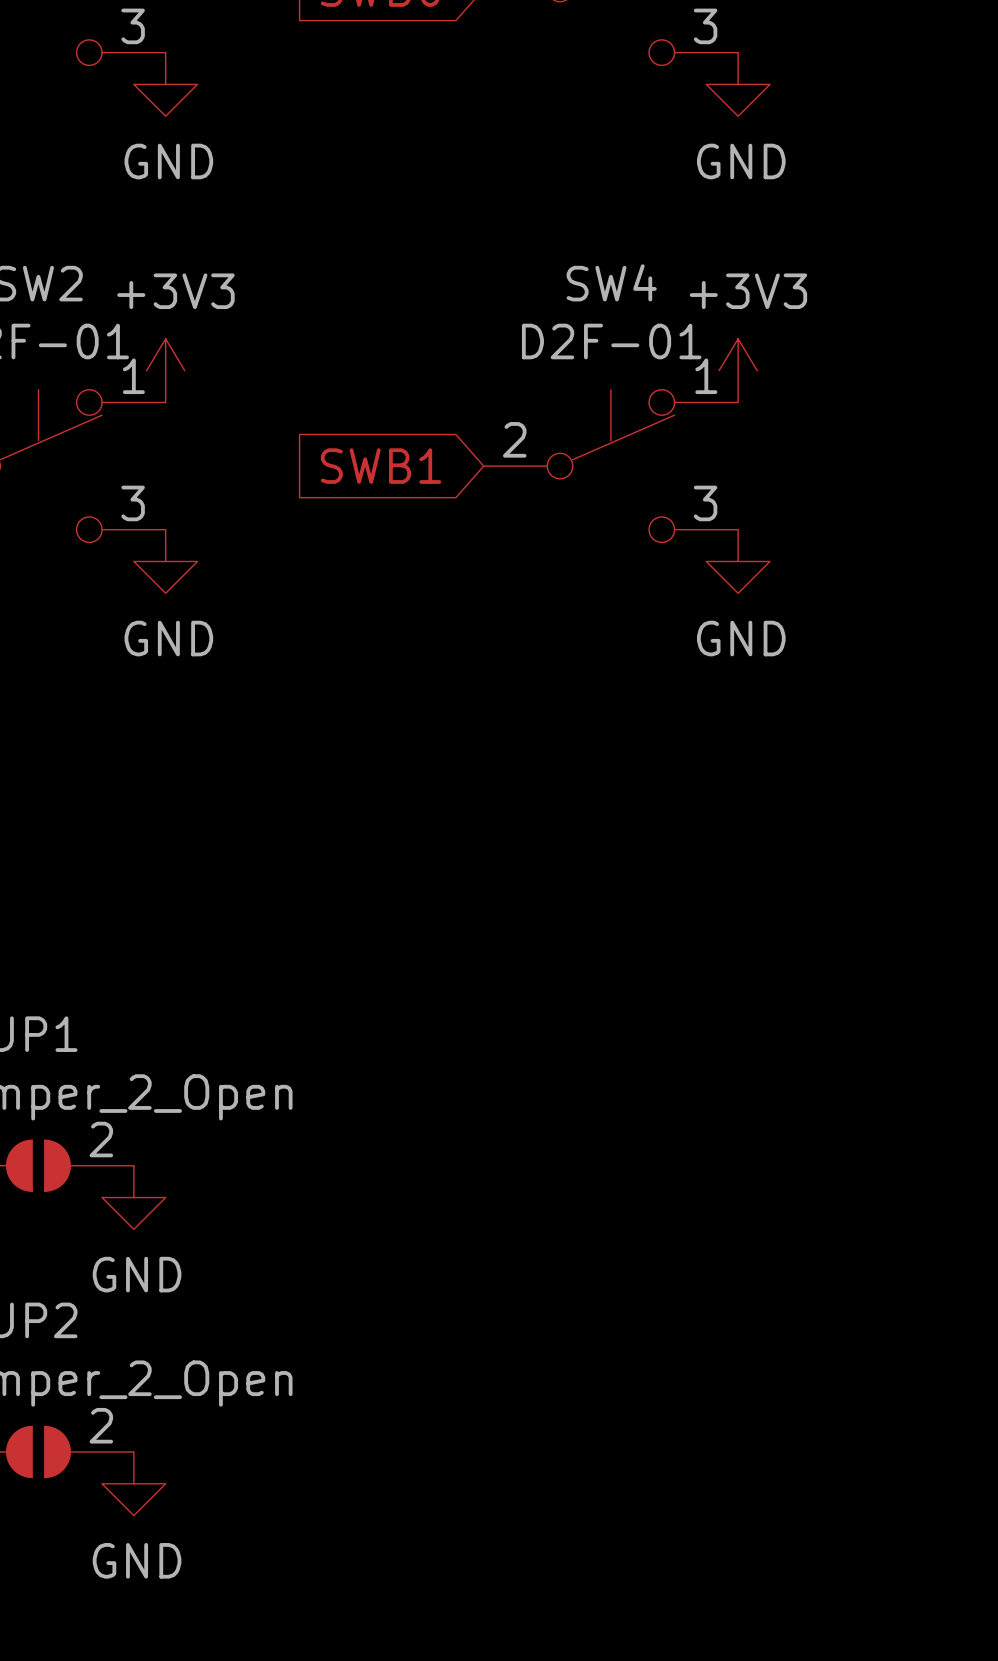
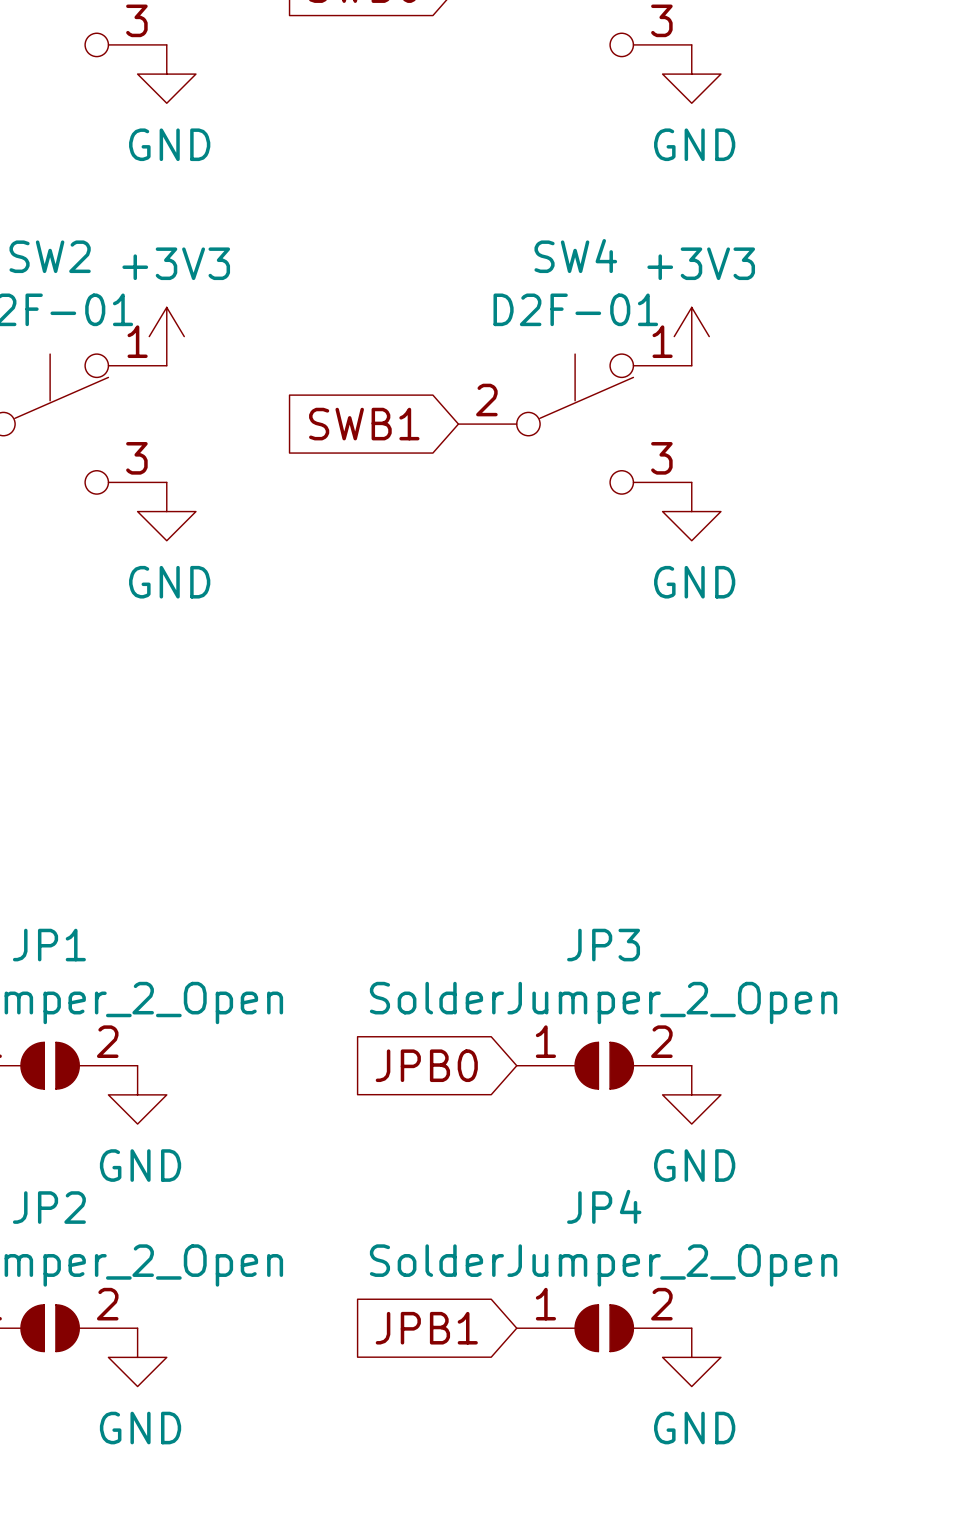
global label: none -> JPB0 (426, 1065)
JP3: none -> SolderJumper_2_Open (604, 1065)
power symbol: none -> GND (691, 1094)
global label: none -> JPB1 (426, 1328)
JP4: none -> SolderJumper_2_Open (604, 1328)
power symbol: none -> GND (691, 1357)

